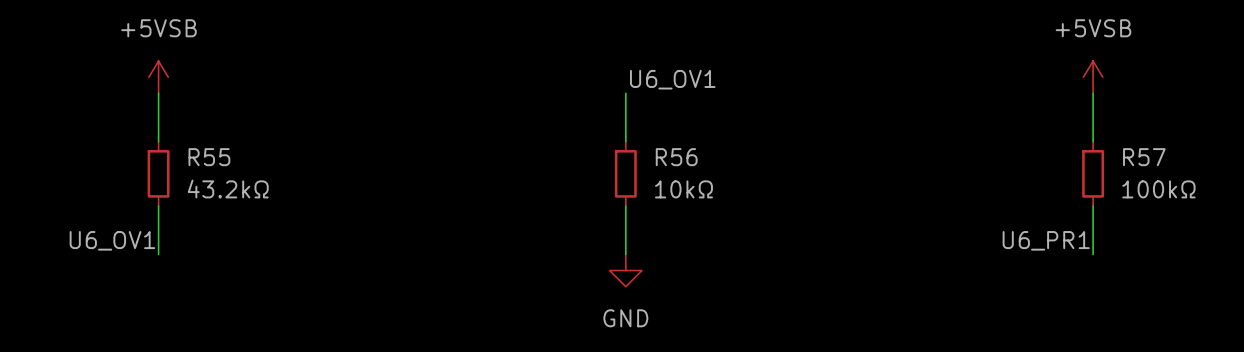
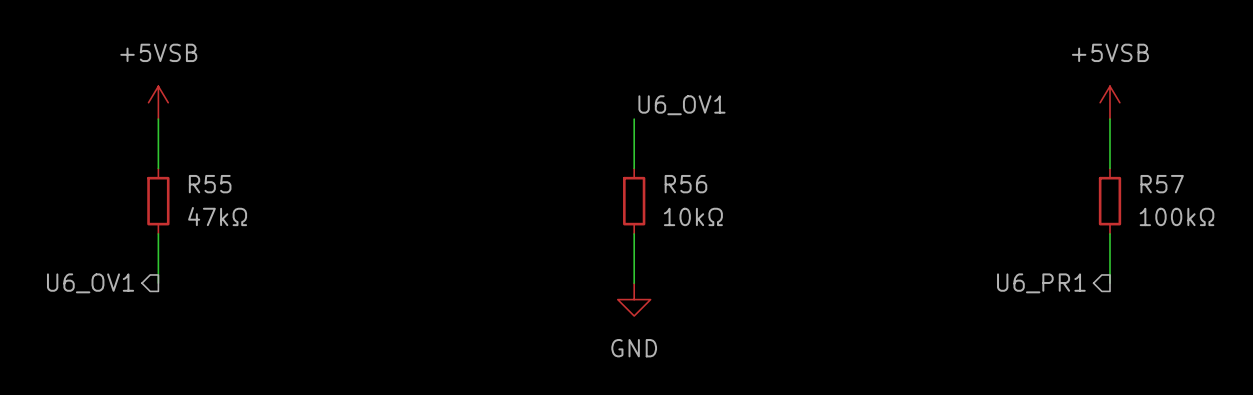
R55 value: 43.2kΩ (228, 189) -> 47kΩ (217, 216)
label: U6_OV1 (112, 240) -> none
label: U6_PR1 (1046, 240) -> none
hierarchical label: none -> U6_OV1 (90, 283)
hierarchical label: none -> U6_PR1 (1041, 283)

